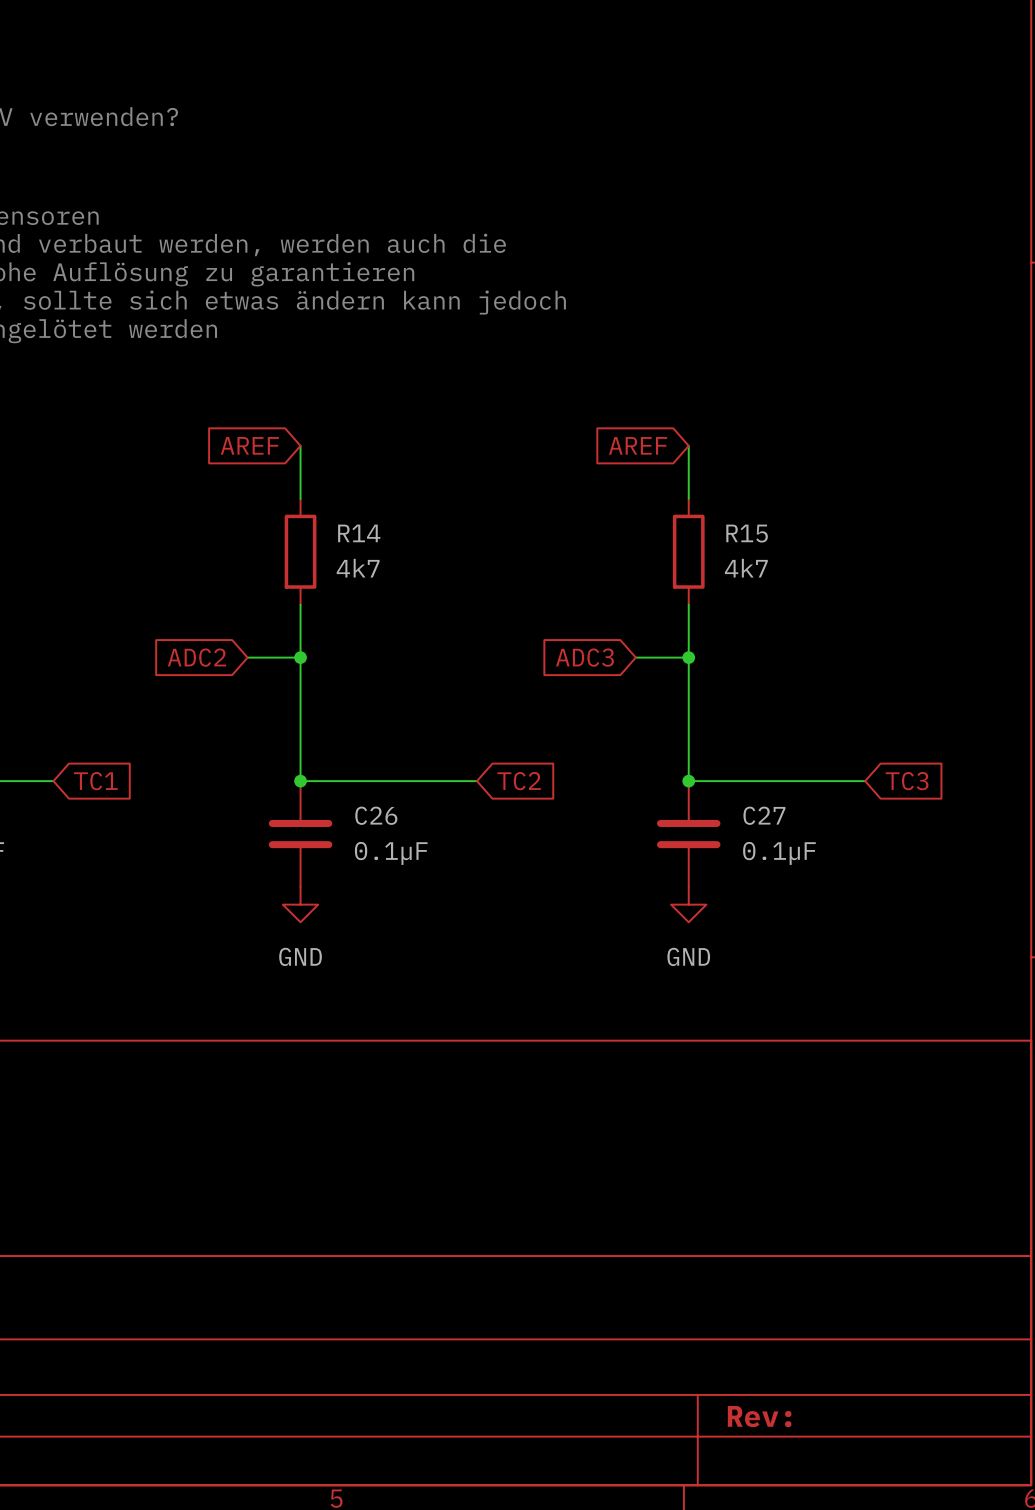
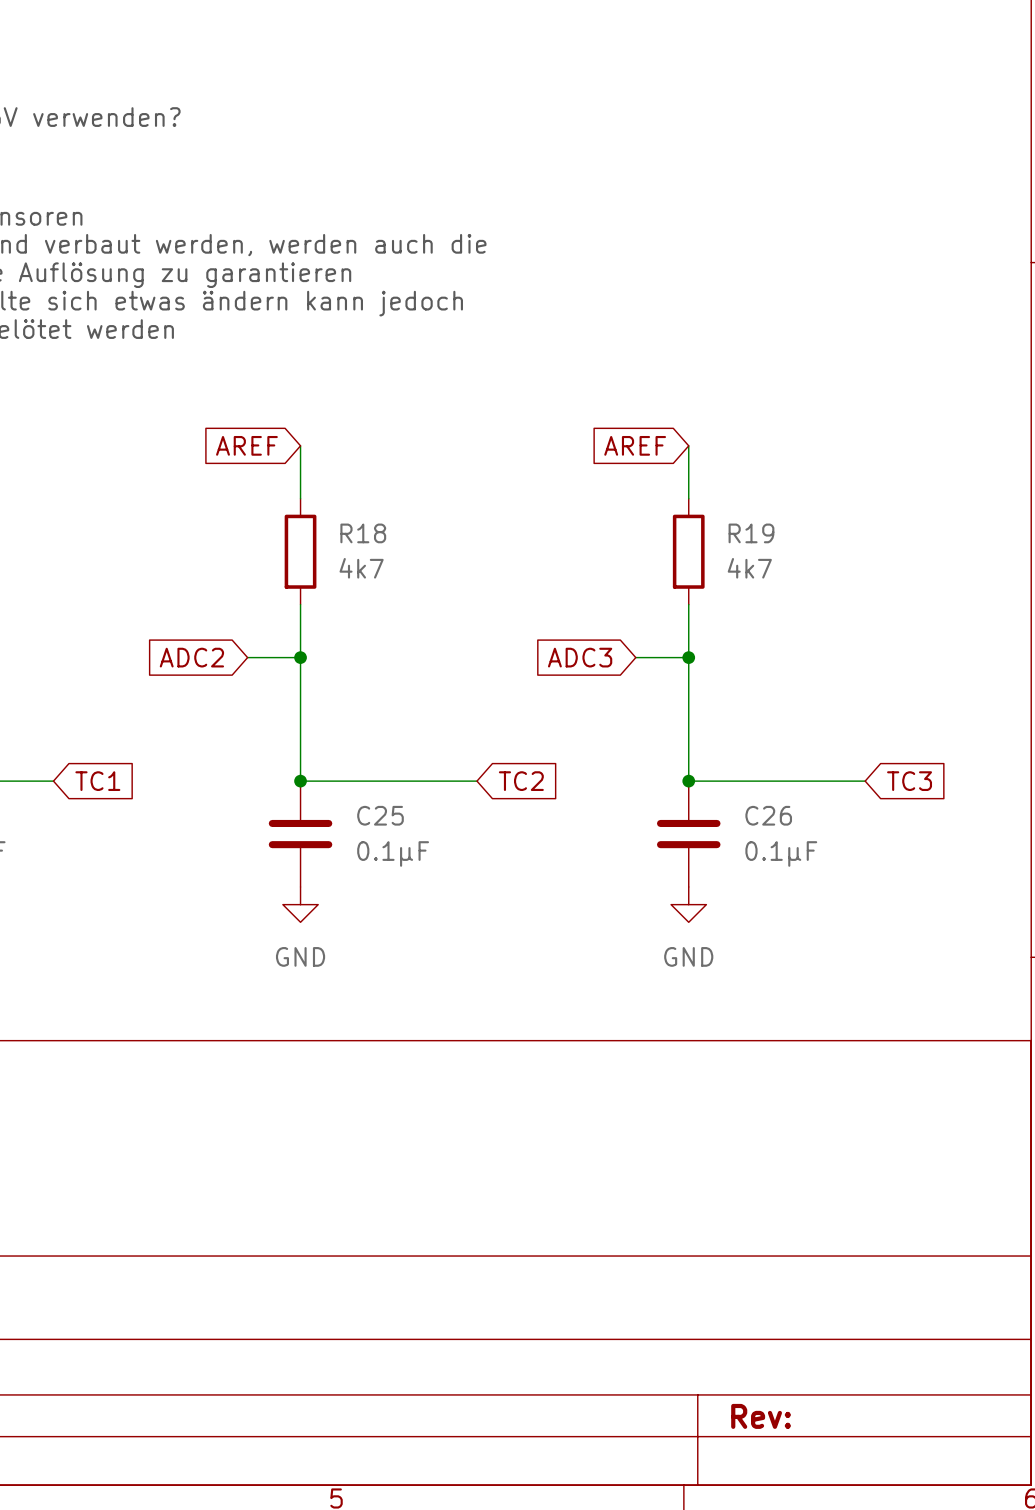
R14 name: R14 (359, 533) -> R18 (363, 533)
R15 name: R15 (747, 533) -> R19 (751, 533)
C26 name: C26 (376, 815) -> C25 (380, 815)
C27 name: C27 (764, 815) -> C26 (768, 815)

